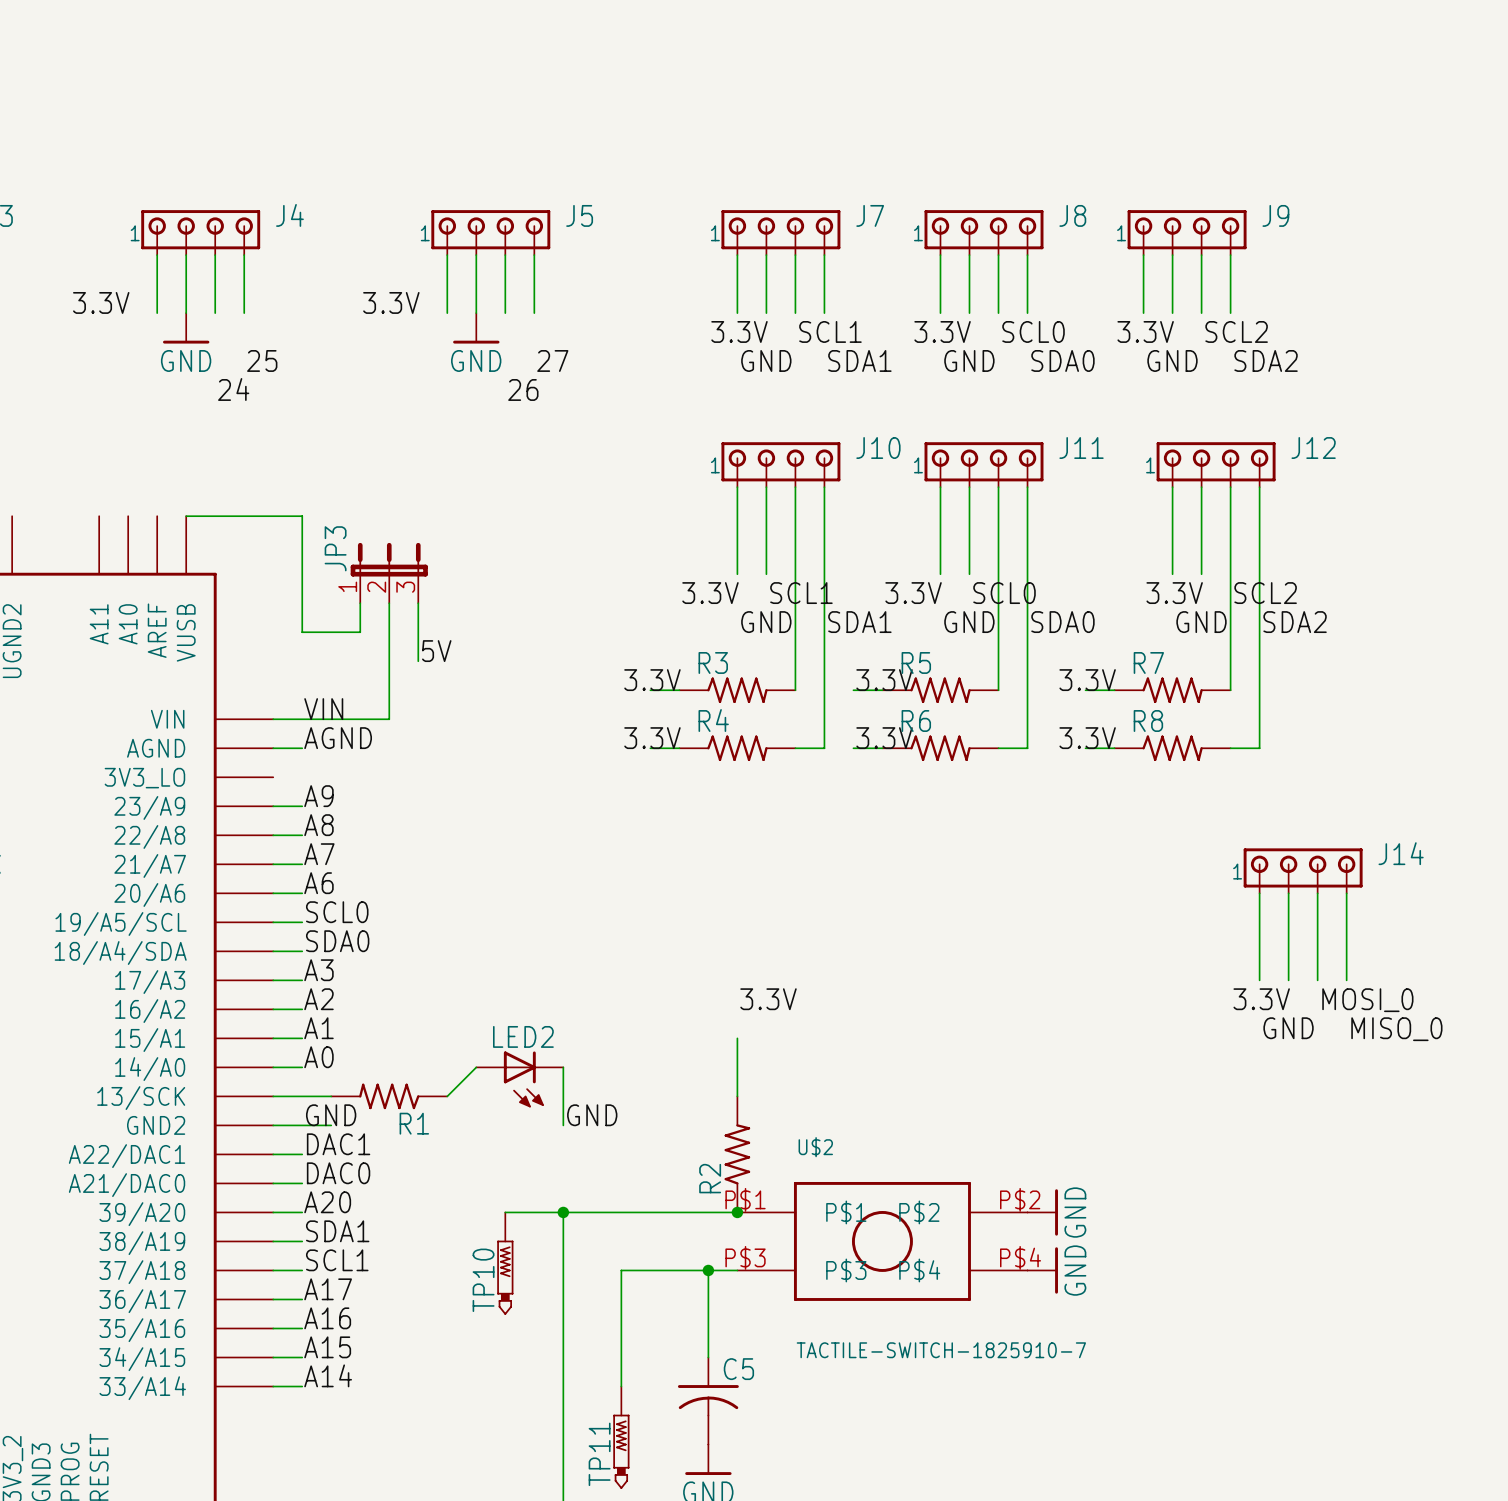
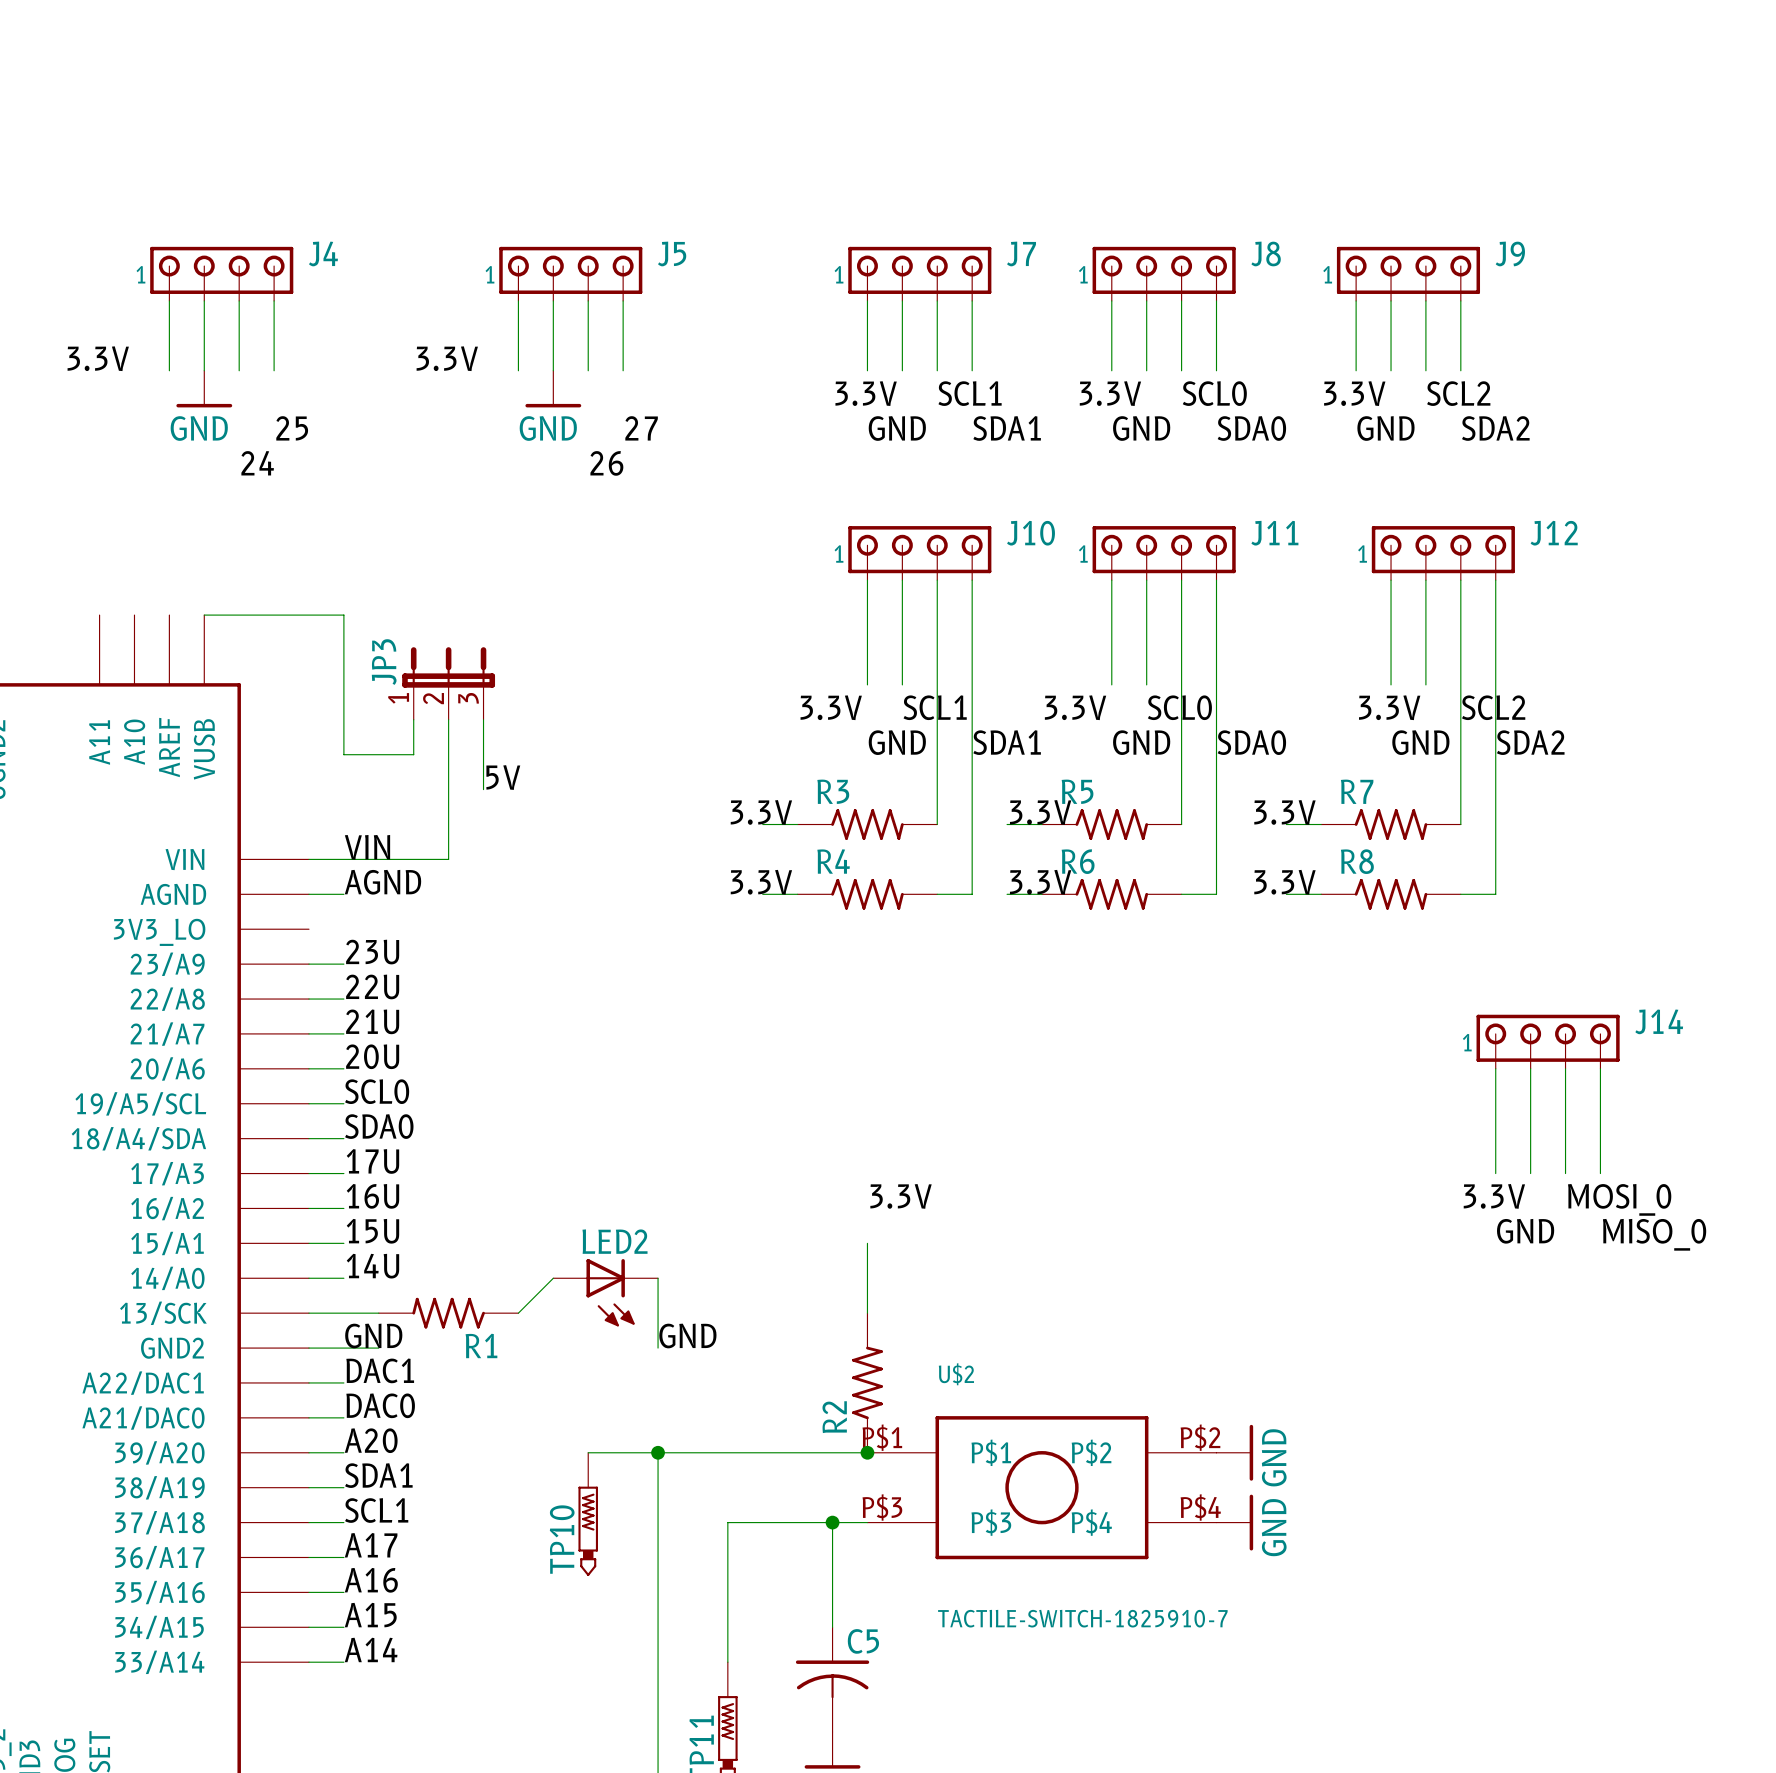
label: A9 (318, 796) -> 23U (372, 952)
label: A8 (318, 825) -> 22U (372, 986)
label: A7 (319, 854) -> 21U (372, 1021)
label: A6 (318, 883) -> 20U (372, 1056)
label: A3 (318, 970) -> 17U (372, 1161)
label: A2 (318, 999) -> 16U (372, 1196)
label: A1 (318, 1028) -> 15U (372, 1231)
label: A0 (318, 1057) -> 14U (372, 1266)

